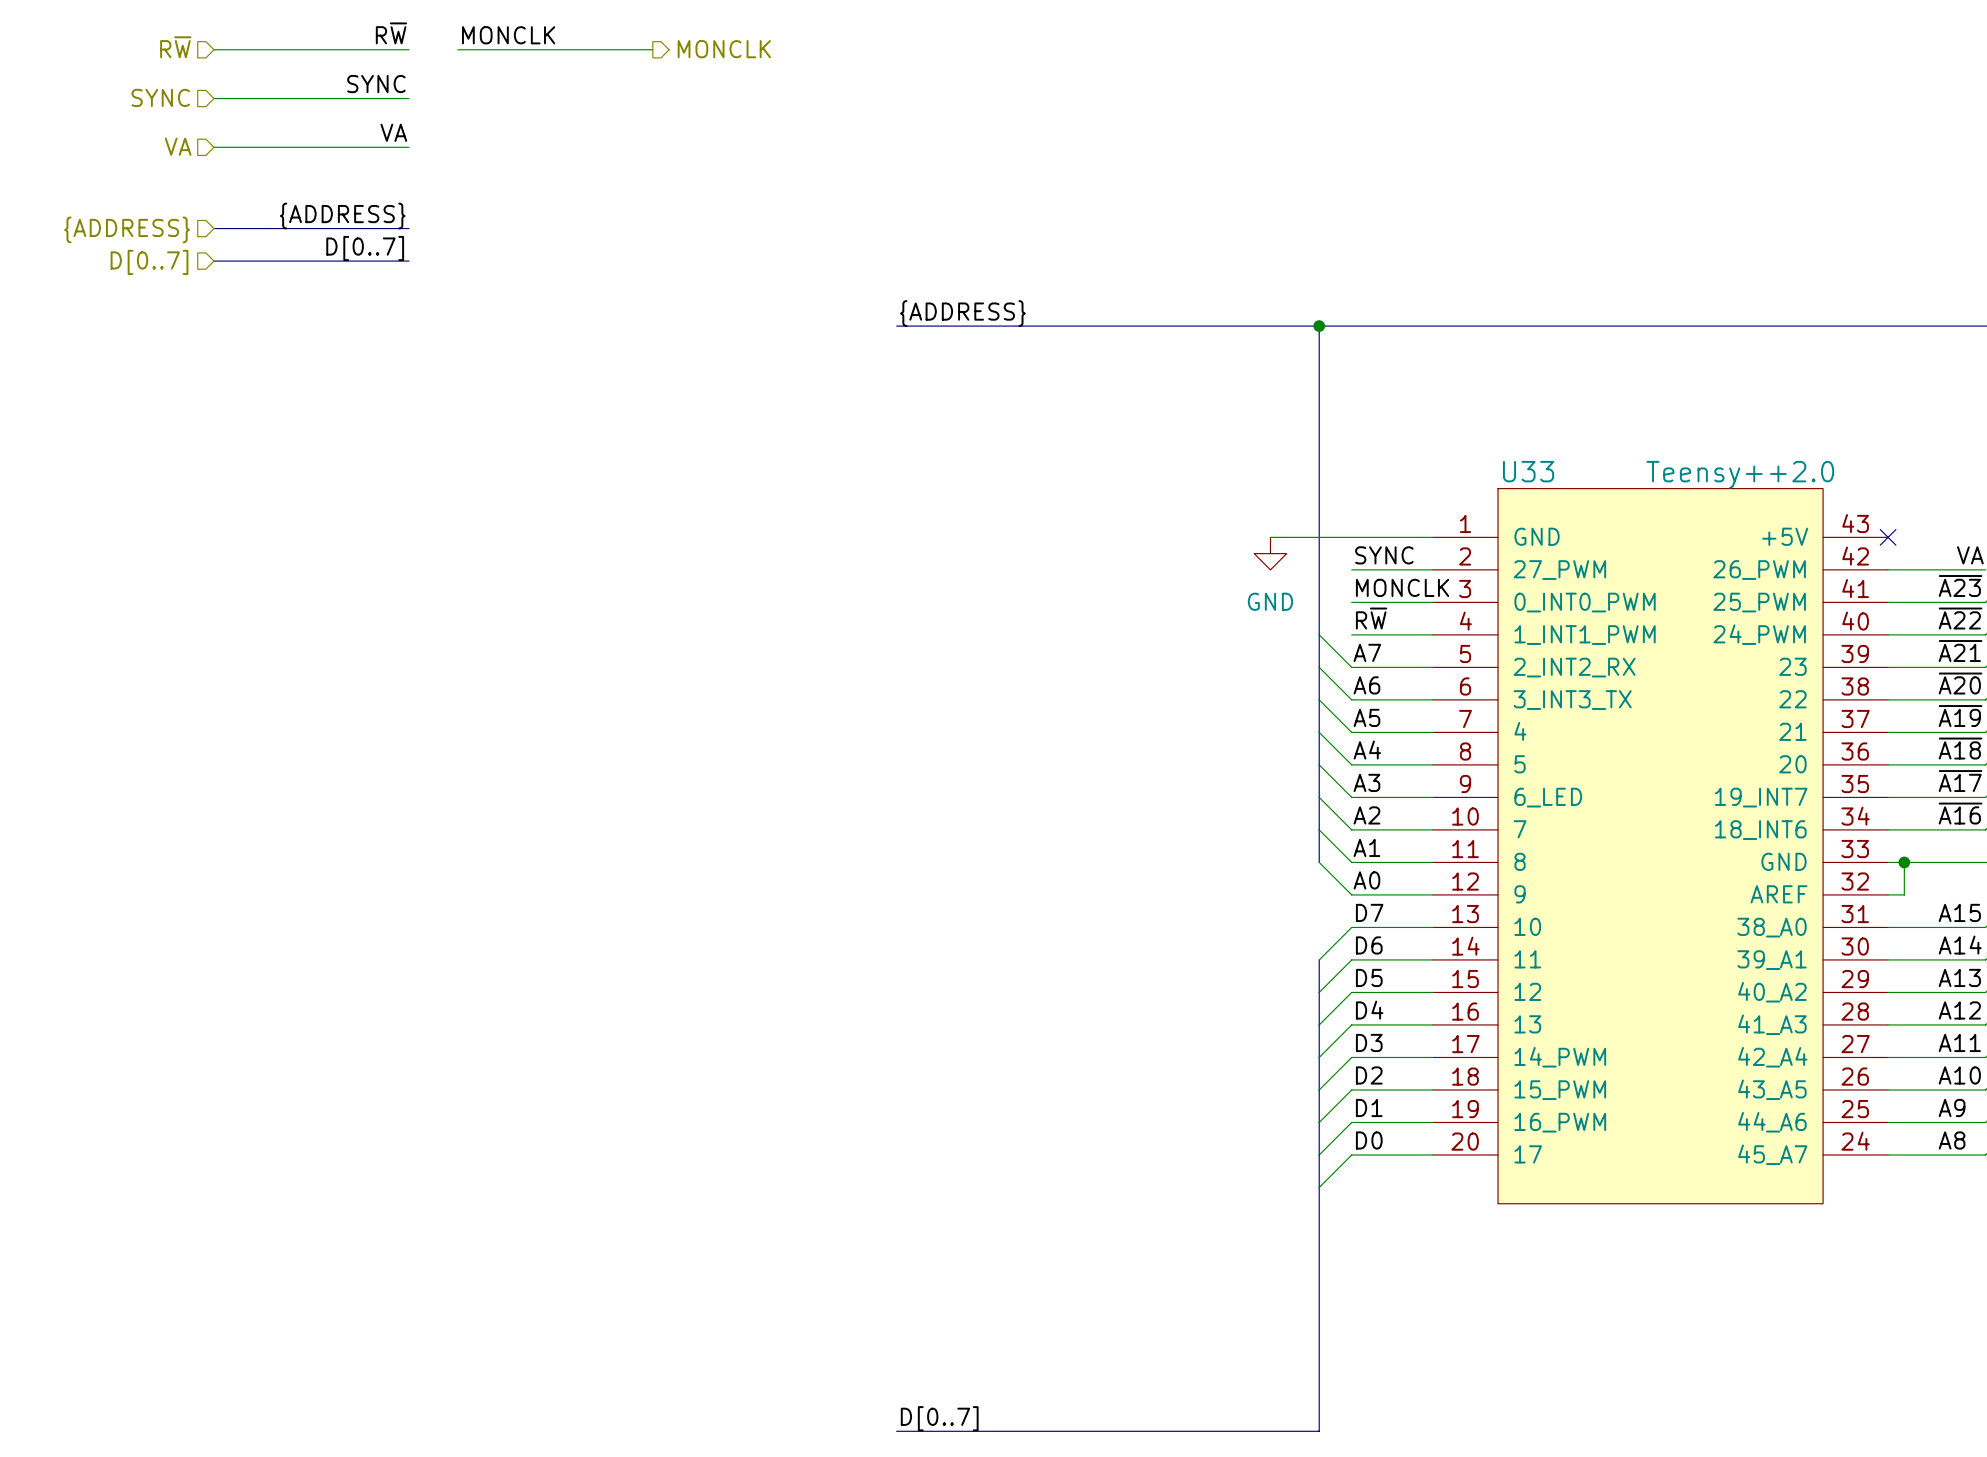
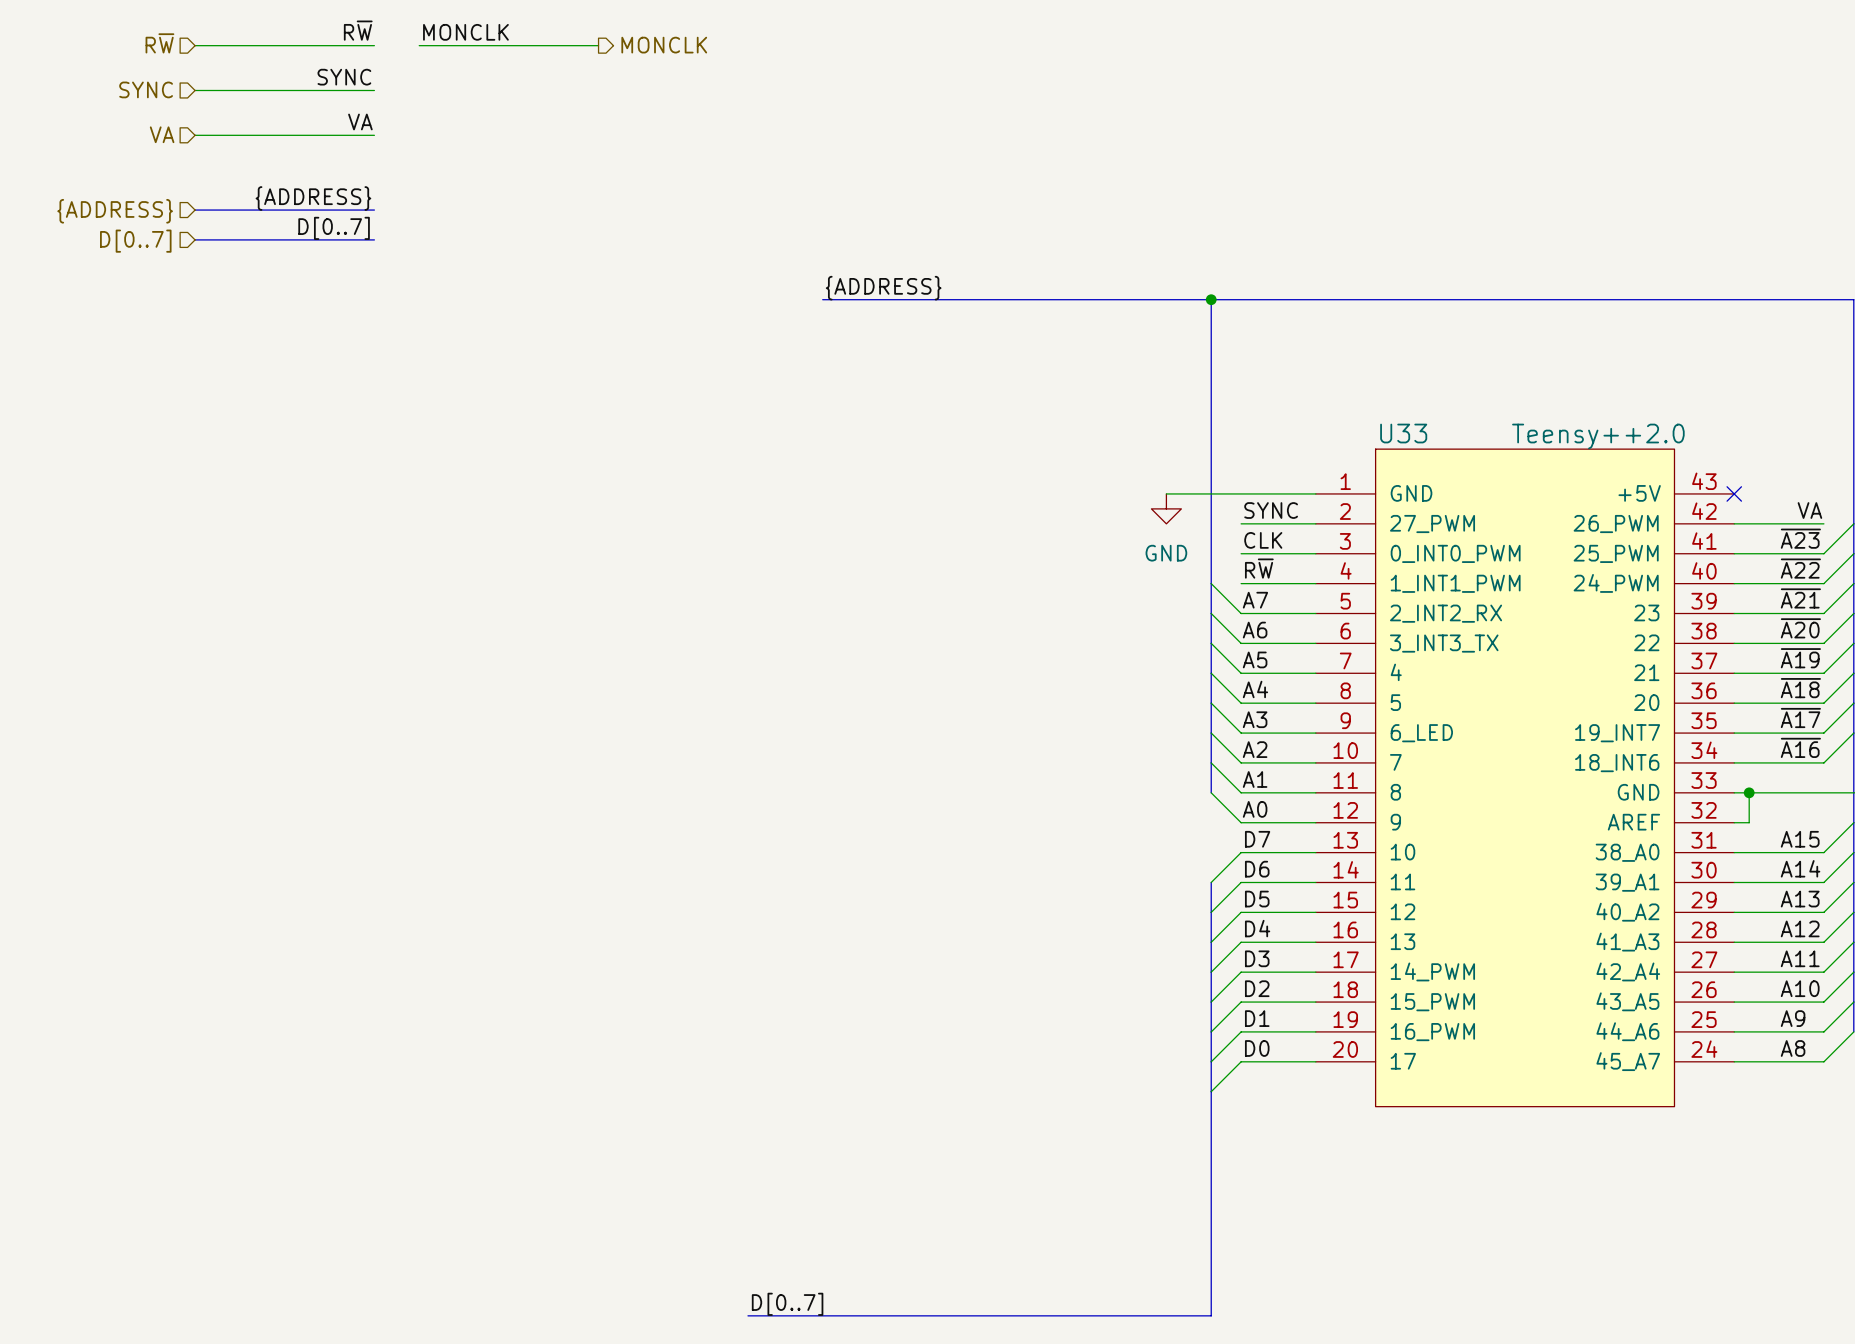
label: MONCLK (1402, 587) -> CLK (1263, 540)
label position: D[0..7] (939, 1418) -> D[0..7] (787, 1304)
bus: none -> (747, 1315) (822, 1315)

